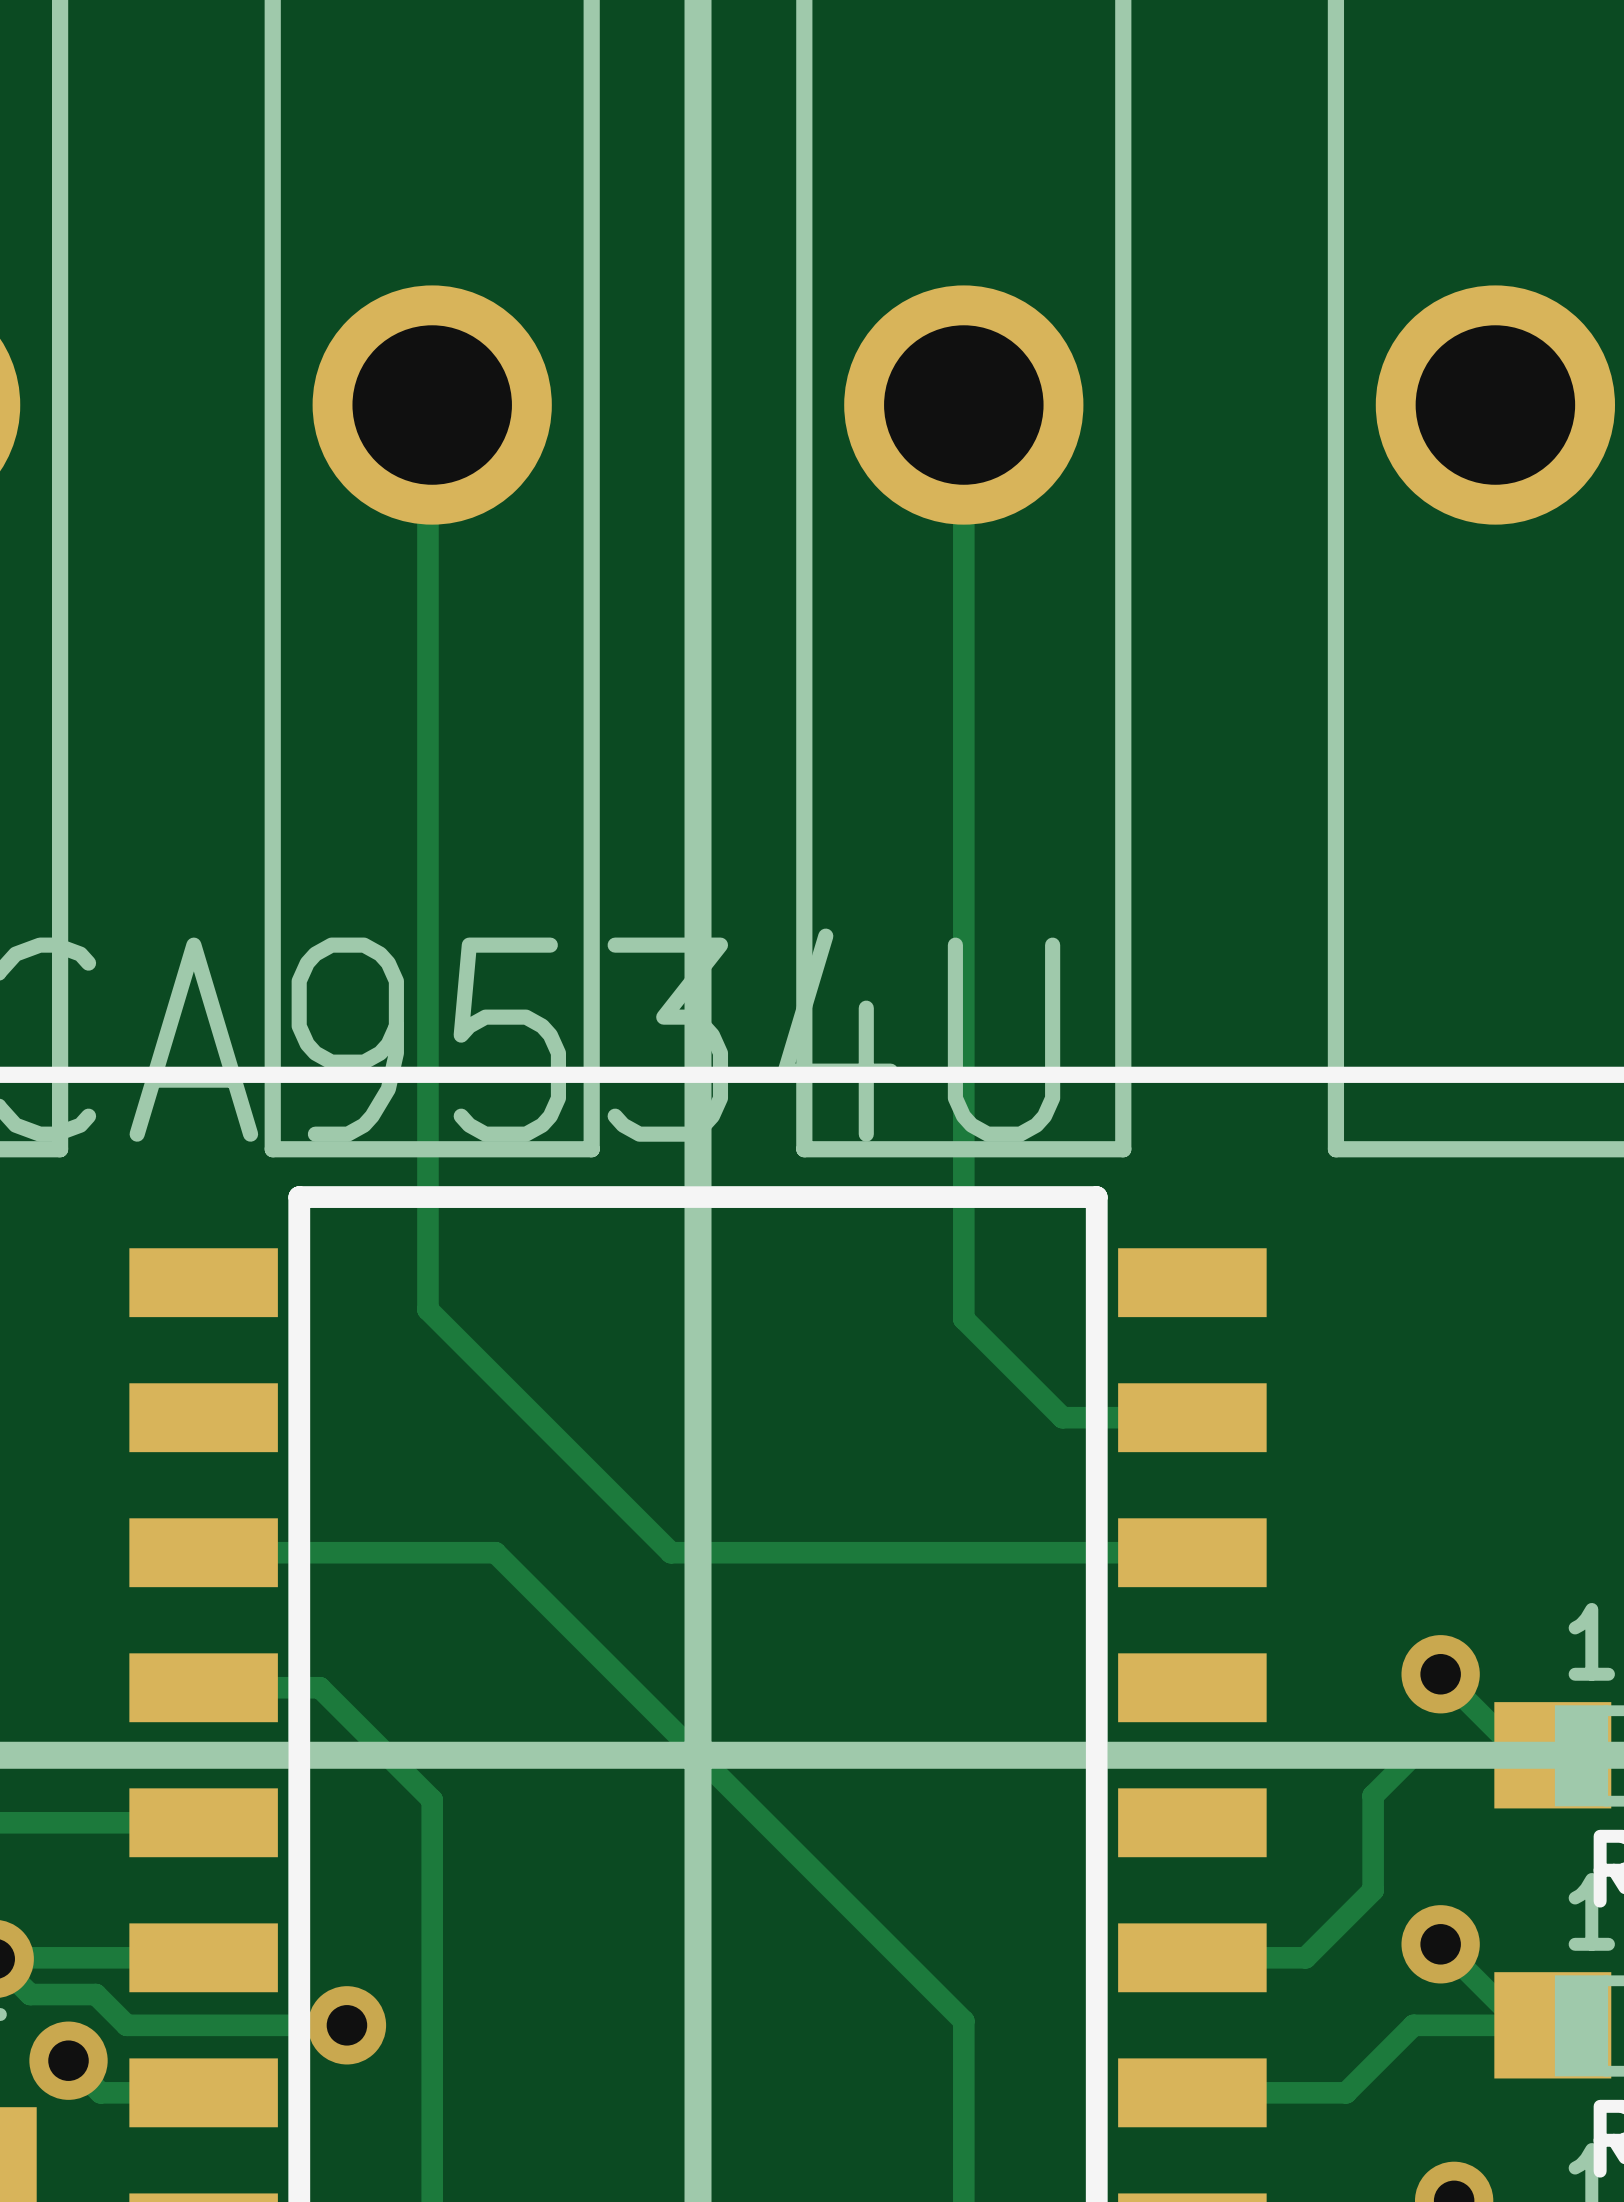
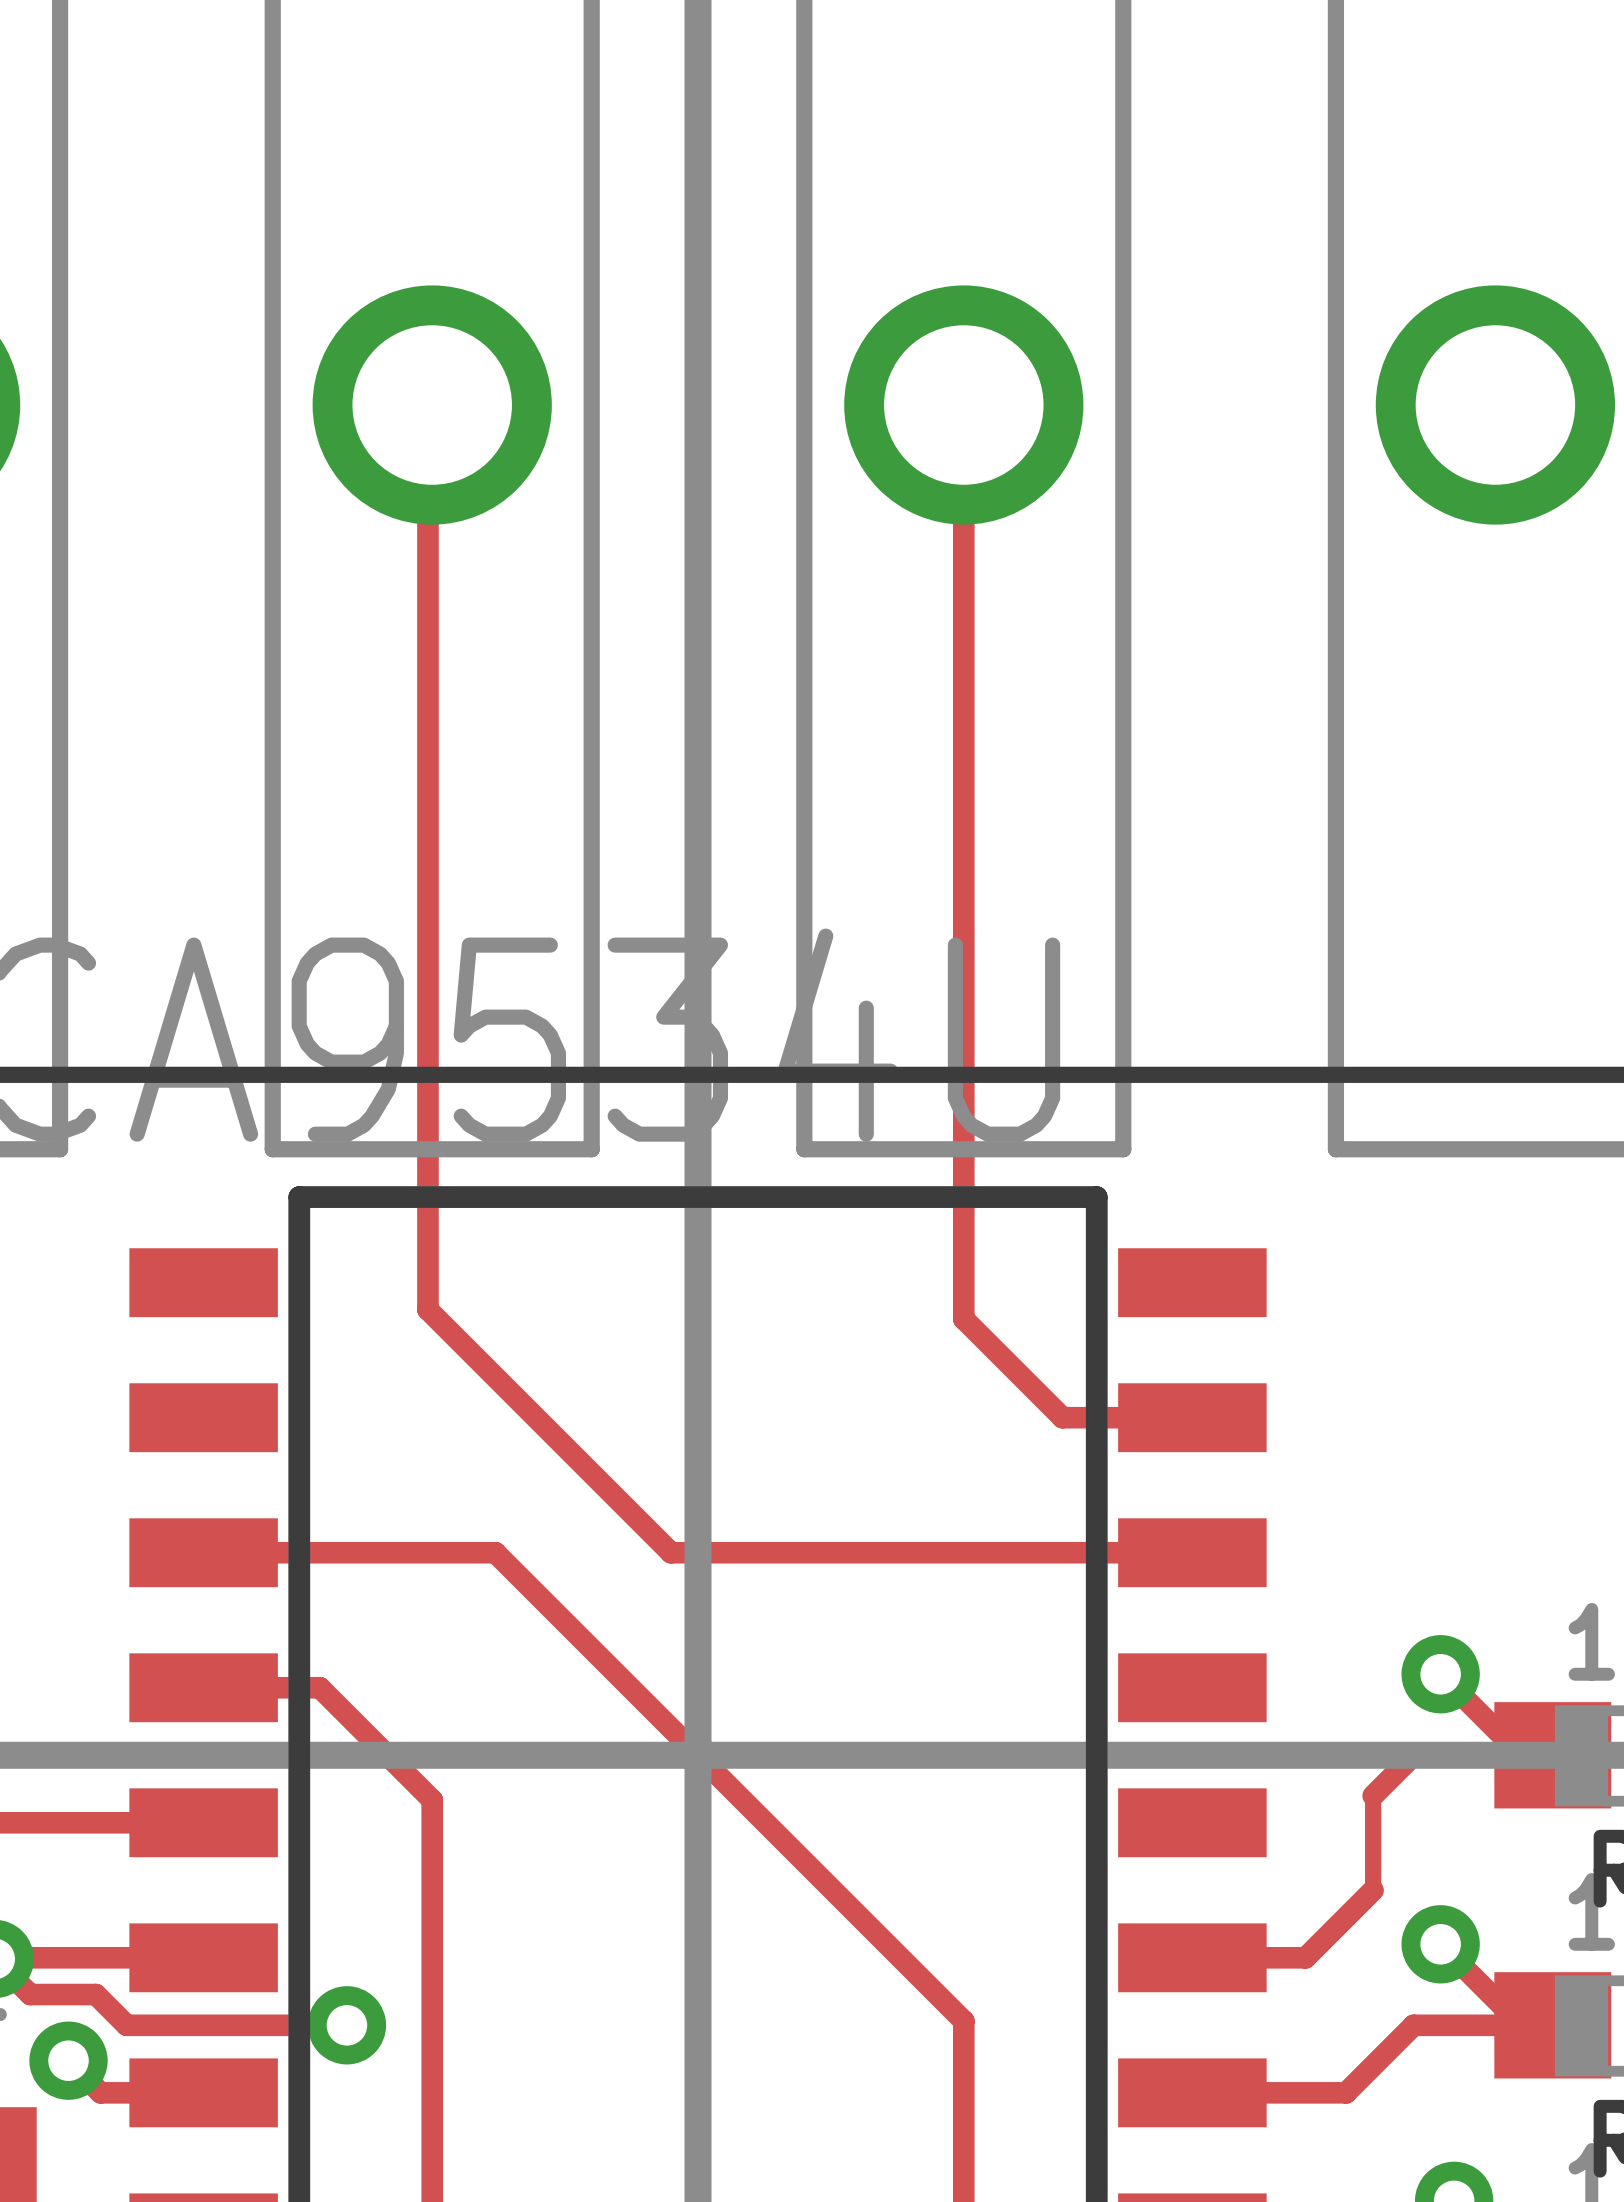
track width: thick (1373, 1795) (1373, 1890) -> thin (1373, 1795) (1373, 1890)

